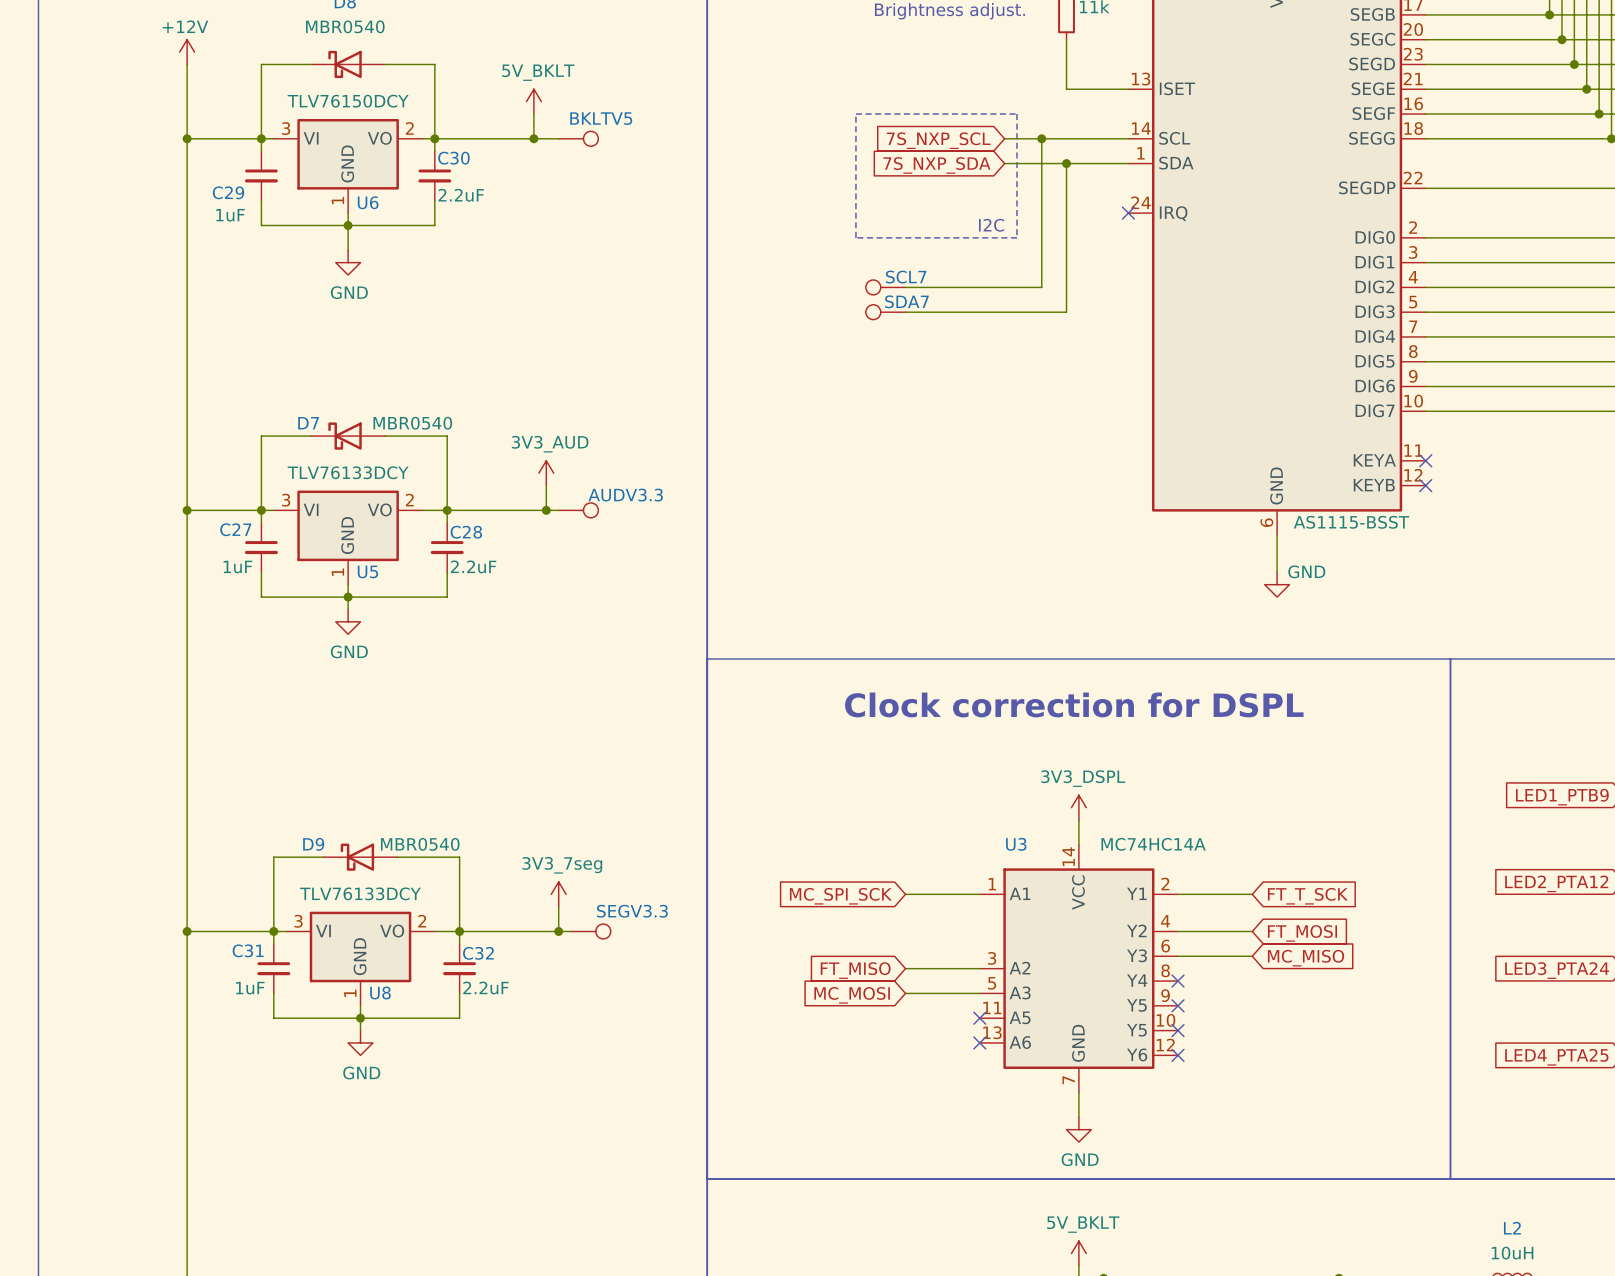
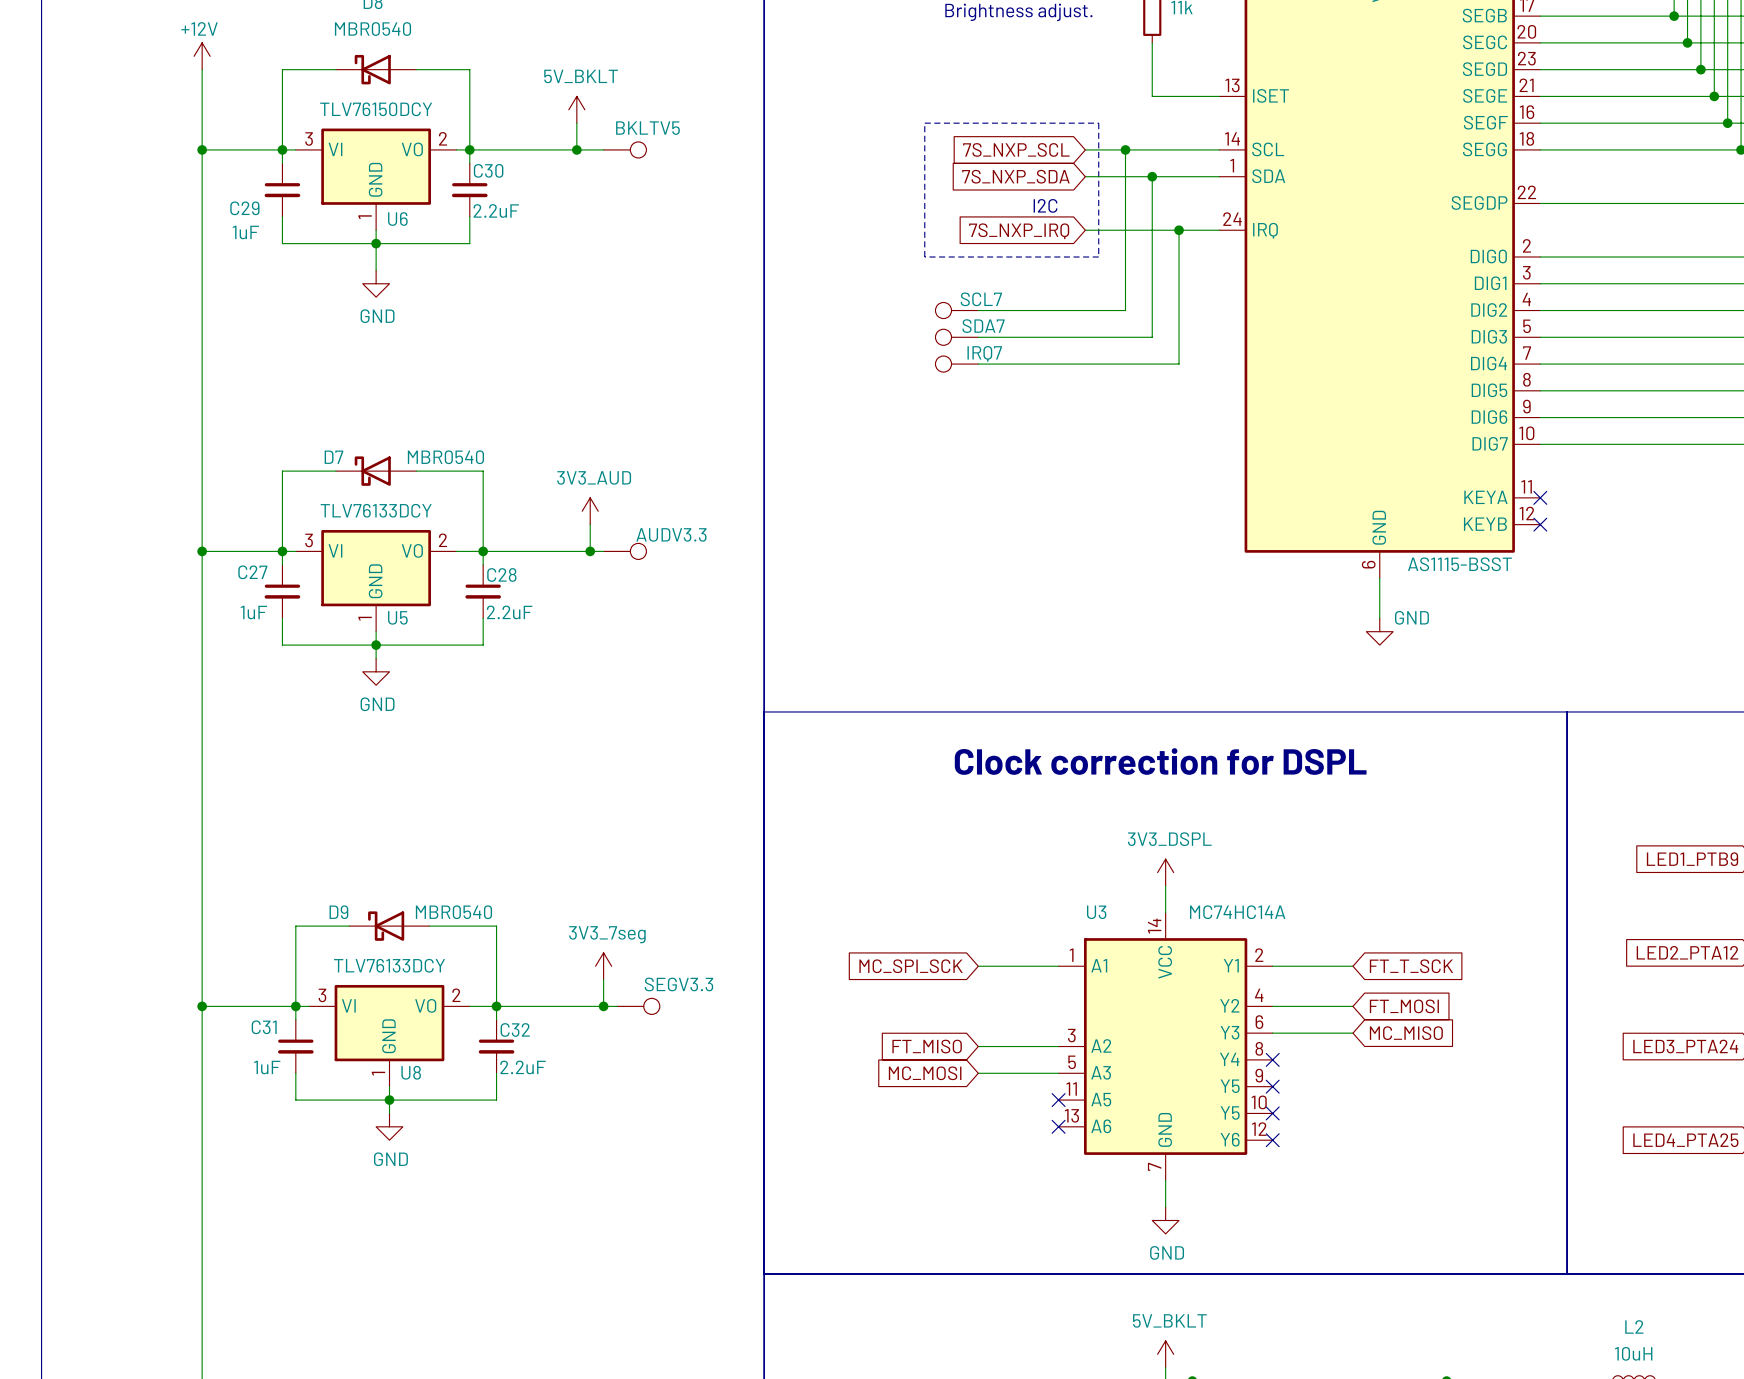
wire: none -> (1085, 230) (1219, 230)
wire: none -> (1179, 230) (1179, 364) (978, 364)
junction: none -> (1179, 230)
no-connect mark: (1128, 213) -> none
global label: none -> 7S_NXP_IRQ (1019, 231)
text position: I2C (991, 225) -> I2C (1045, 205)
IRQ7: none -> (956, 364)

